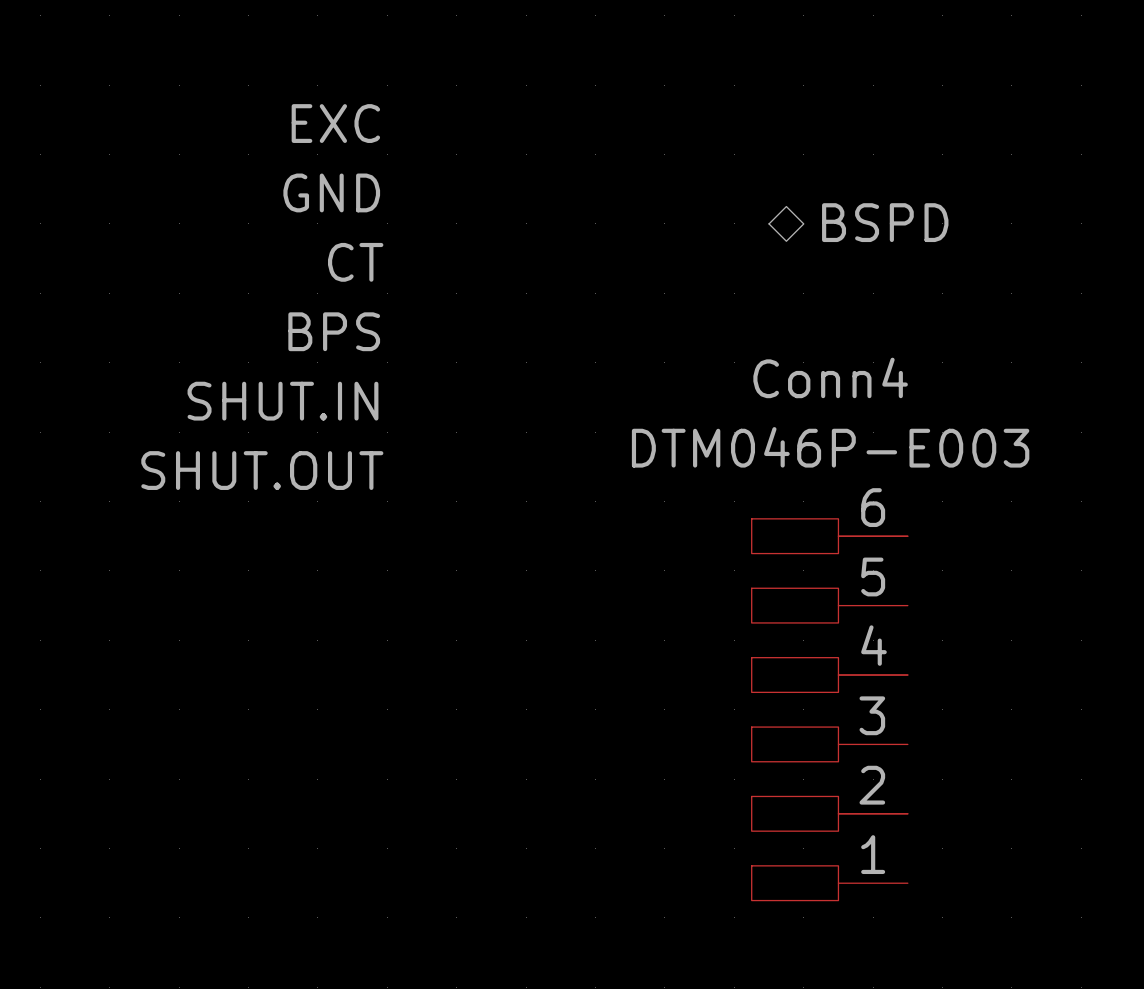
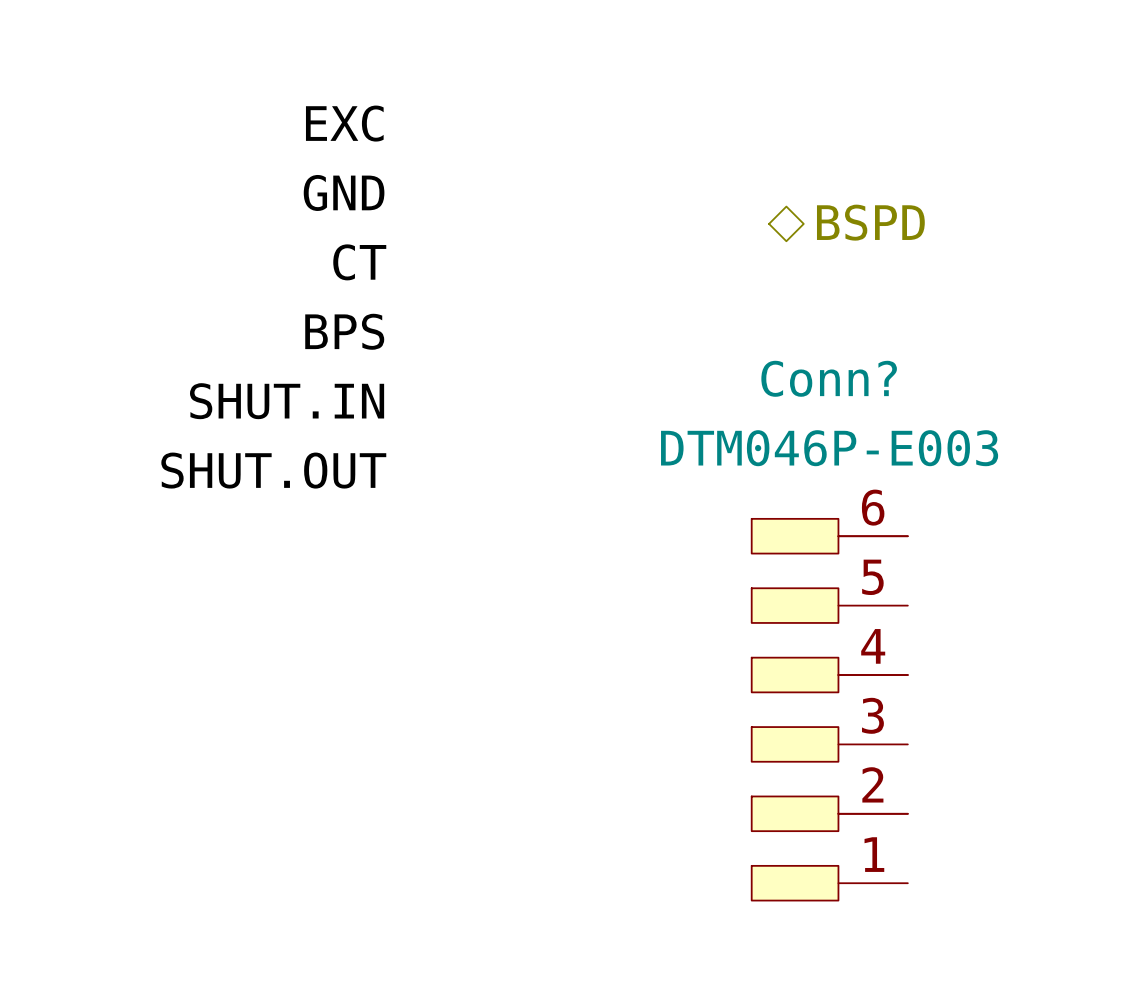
Conn4 name: Conn4 (830, 377) -> Conn? (829, 378)

